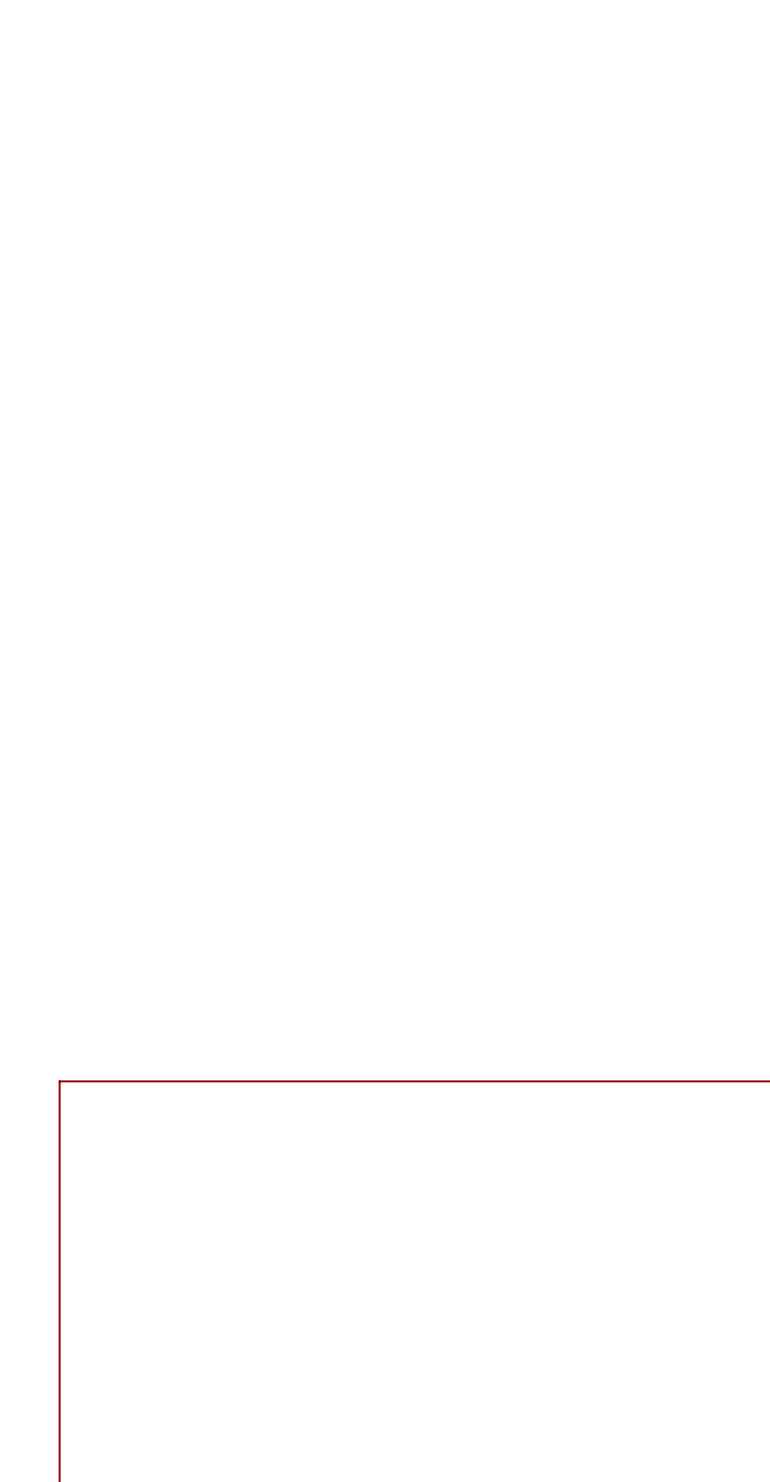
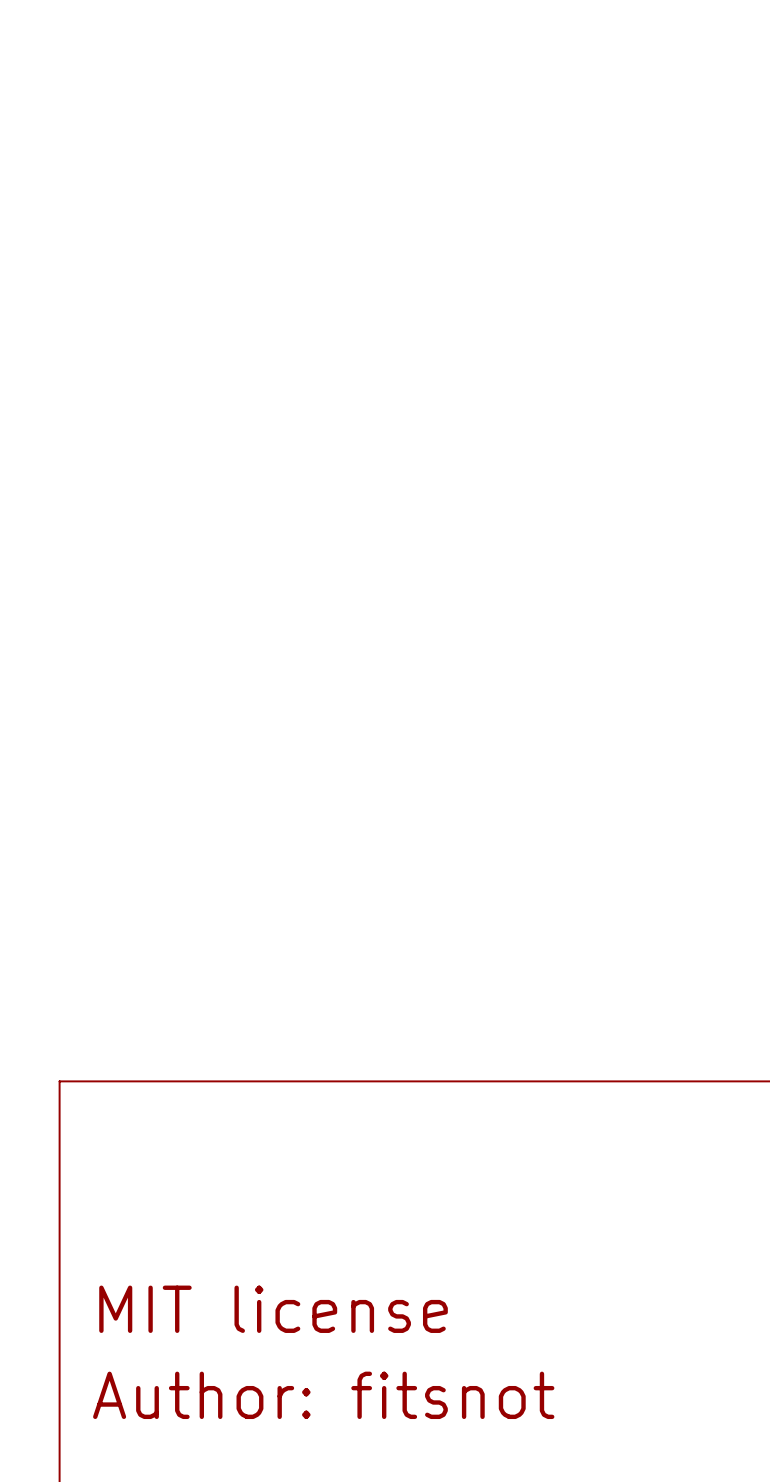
title block: none -> MIT license (273, 1309)
title block: none -> Author: fitsnot (323, 1395)

